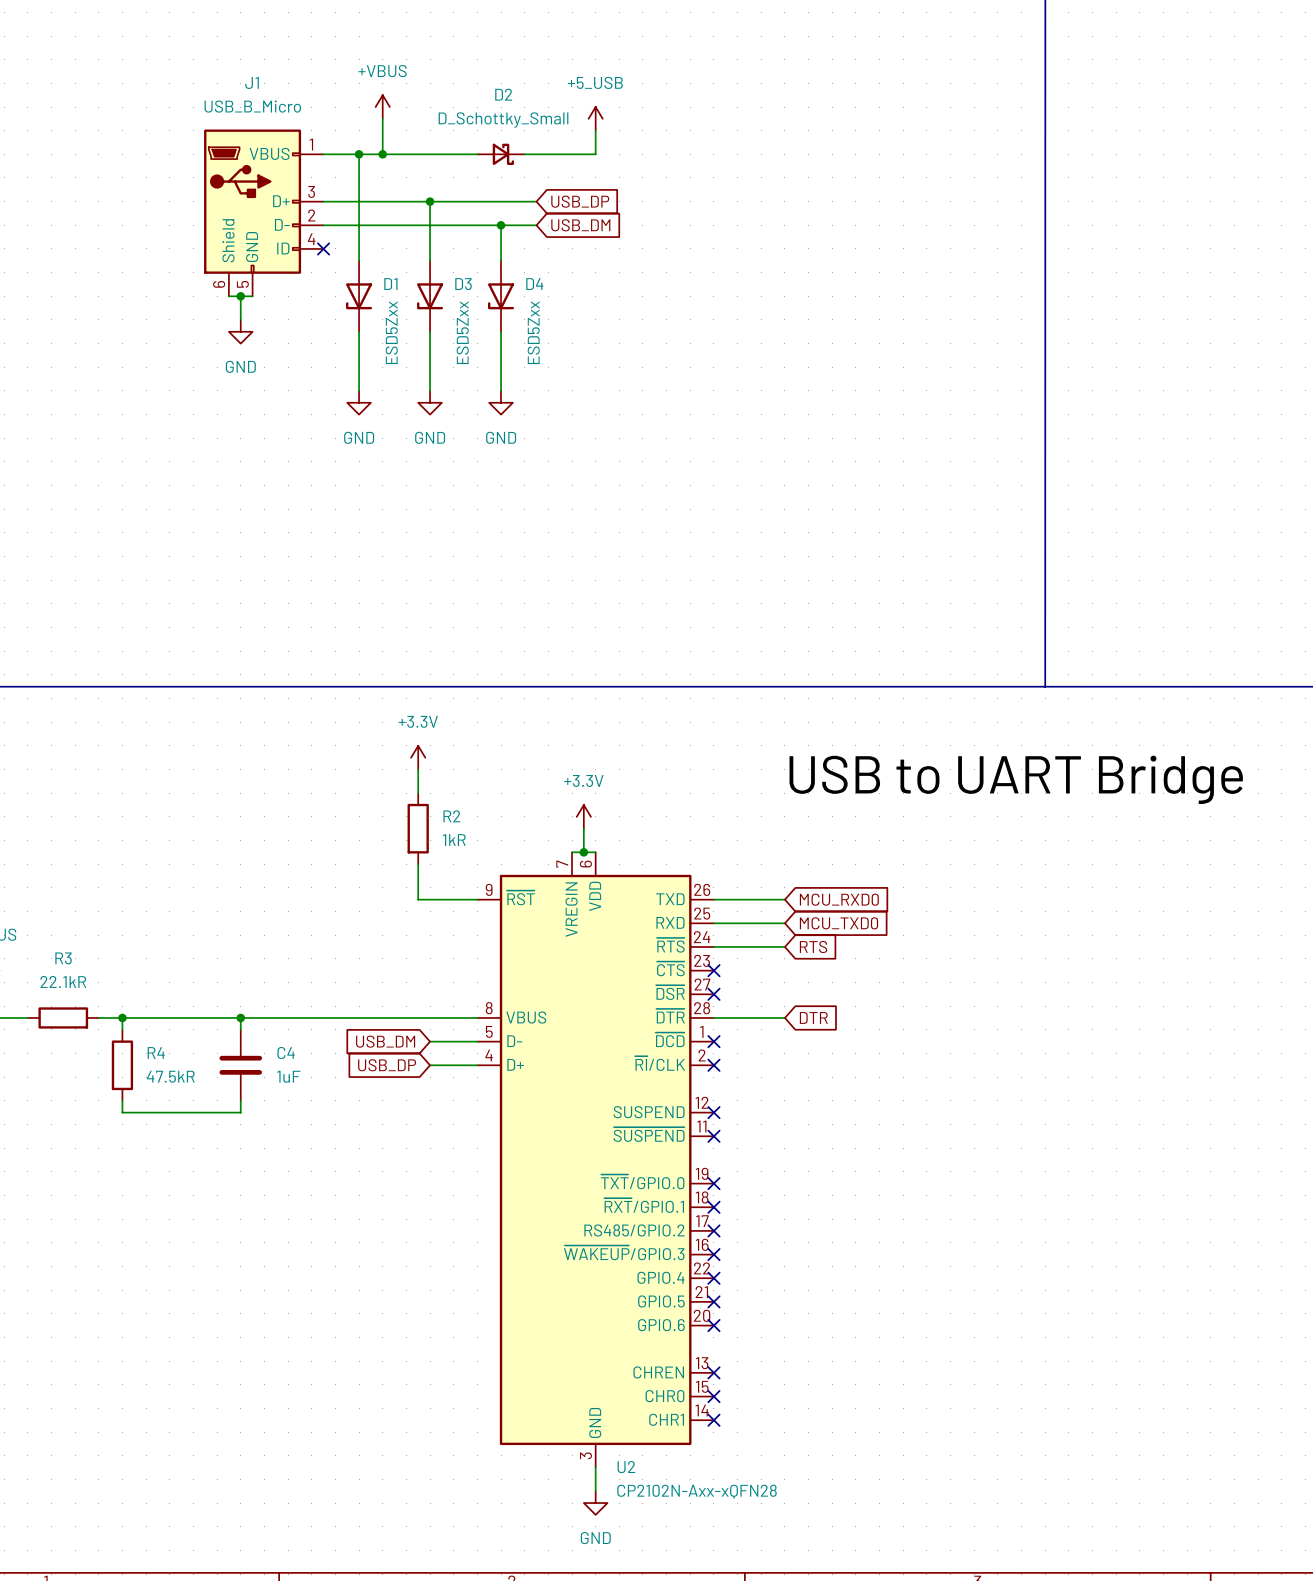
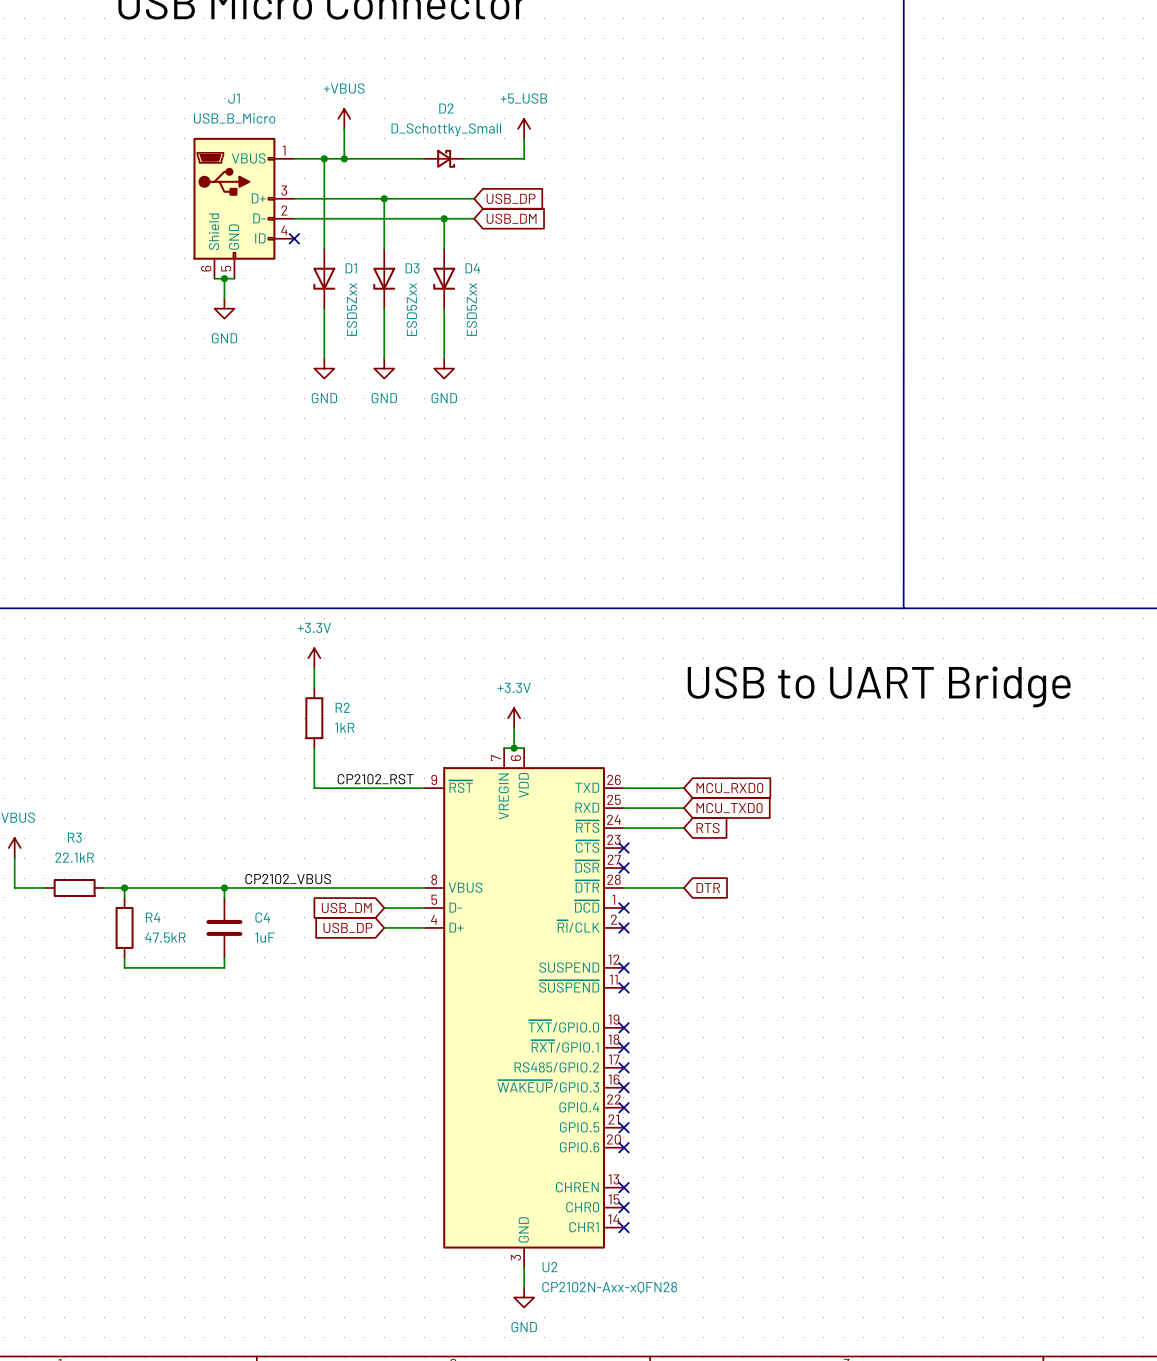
power symbol position: +3.3V (418, 757) -> +3.3V (314, 658)
wire: (418, 769) (418, 793) -> (314, 668) (314, 688)
R2 position: (418, 828) -> (314, 718)
wire: (418, 864) (418, 899) -> (314, 748) (314, 788) (374, 788)
label: none -> CP2102_RST (375, 779)
label: none -> CP2102_VBUS (288, 879)

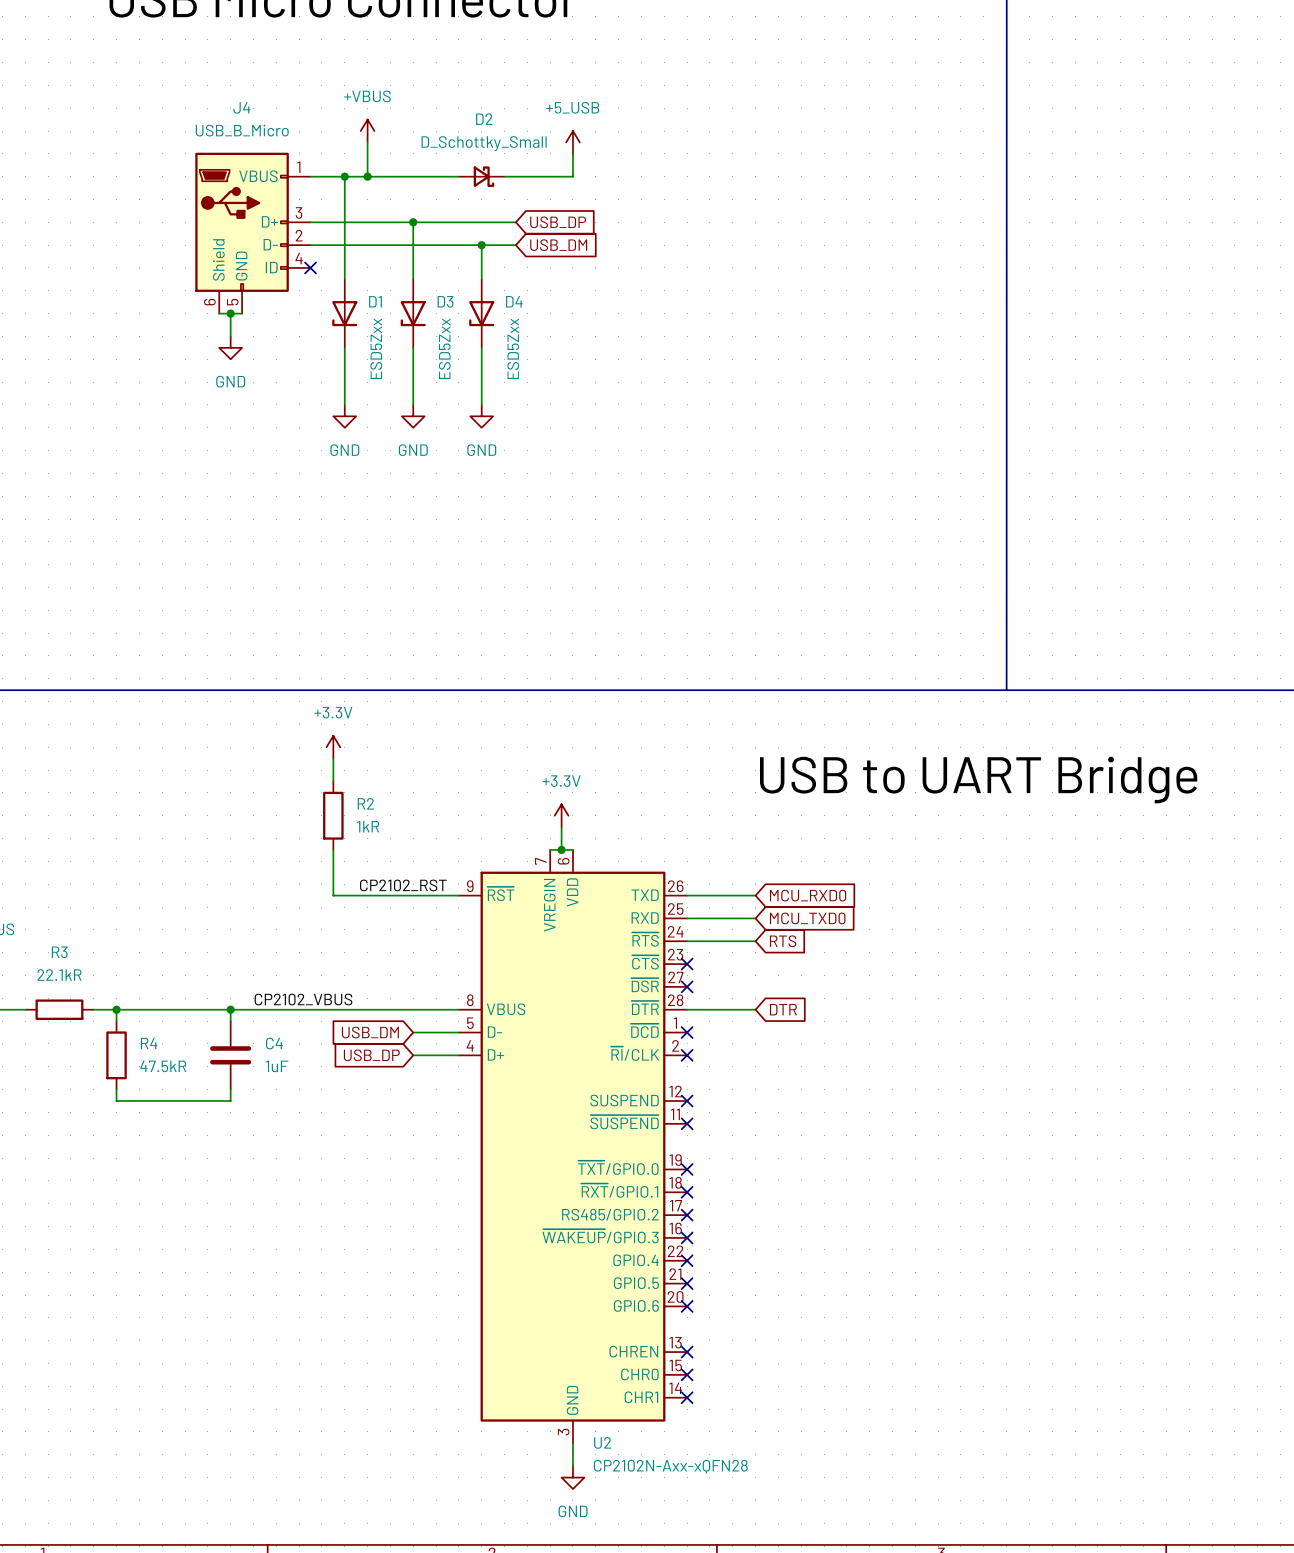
J1 name: J1 (233, 98) -> J4 (241, 107)

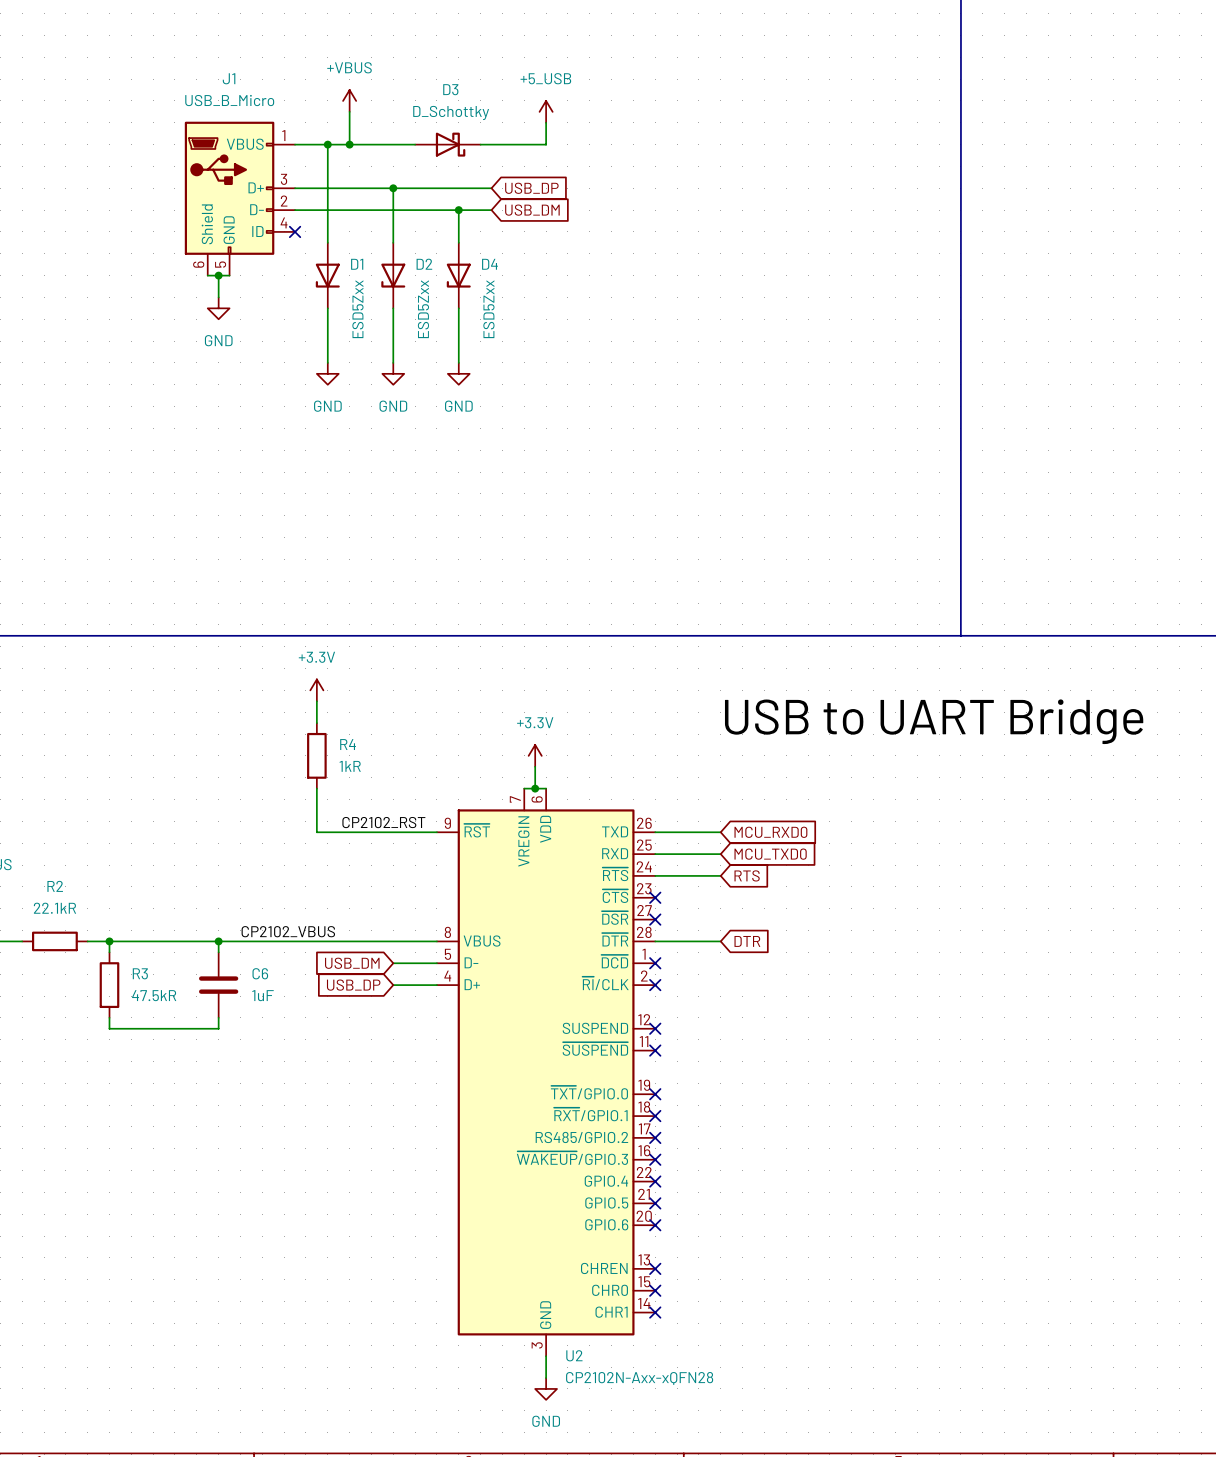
J4 name: J4 (241, 107) -> J1 (229, 78)
D3: none -> D_Schottky (447, 144)
D2: D_Schottky_Small (481, 176) -> none
D3 name: D3 (445, 301) -> D2 (424, 264)
R2 name: R2 (365, 803) -> R4 (348, 744)
R3 name: R3 (59, 952) -> R2 (55, 886)
R4 name: R4 (149, 1043) -> R3 (140, 973)
C4 name: C4 (274, 1043) -> C6 (260, 973)

